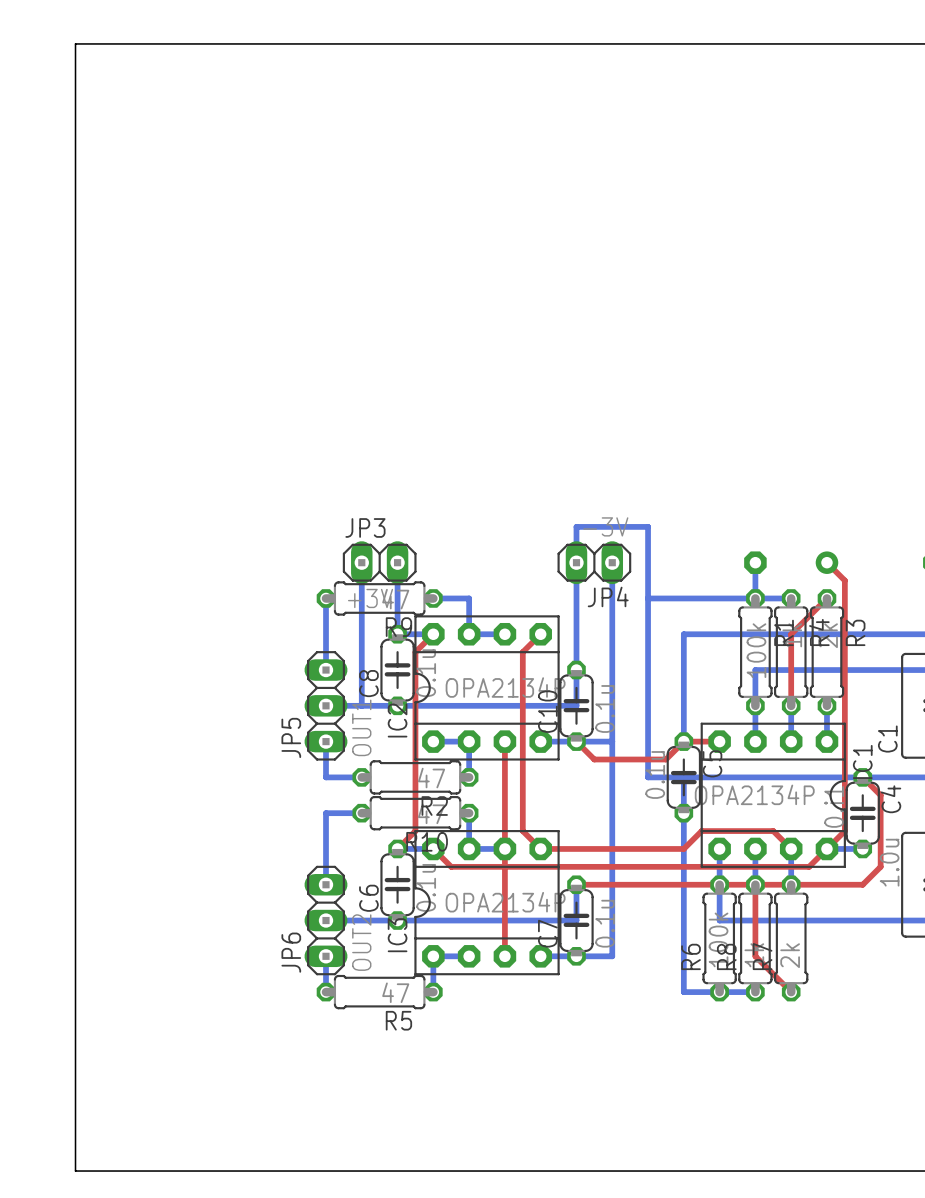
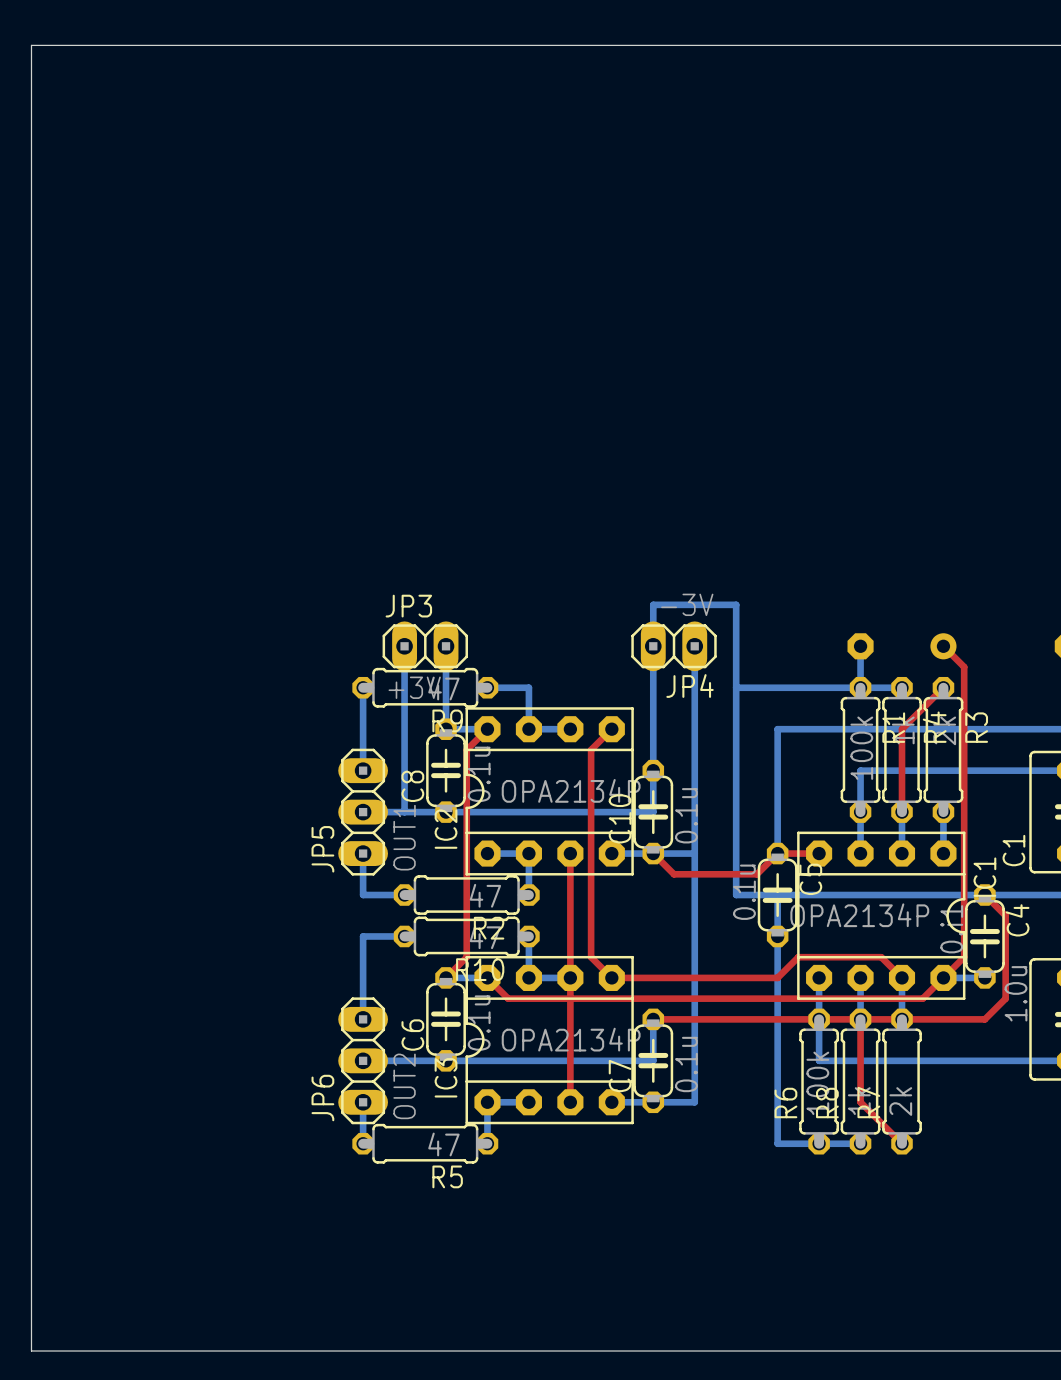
board edge: (75, 43) (75, 1171) -> (72, 45) (31, 45) (31, 1351) (72, 1351)

